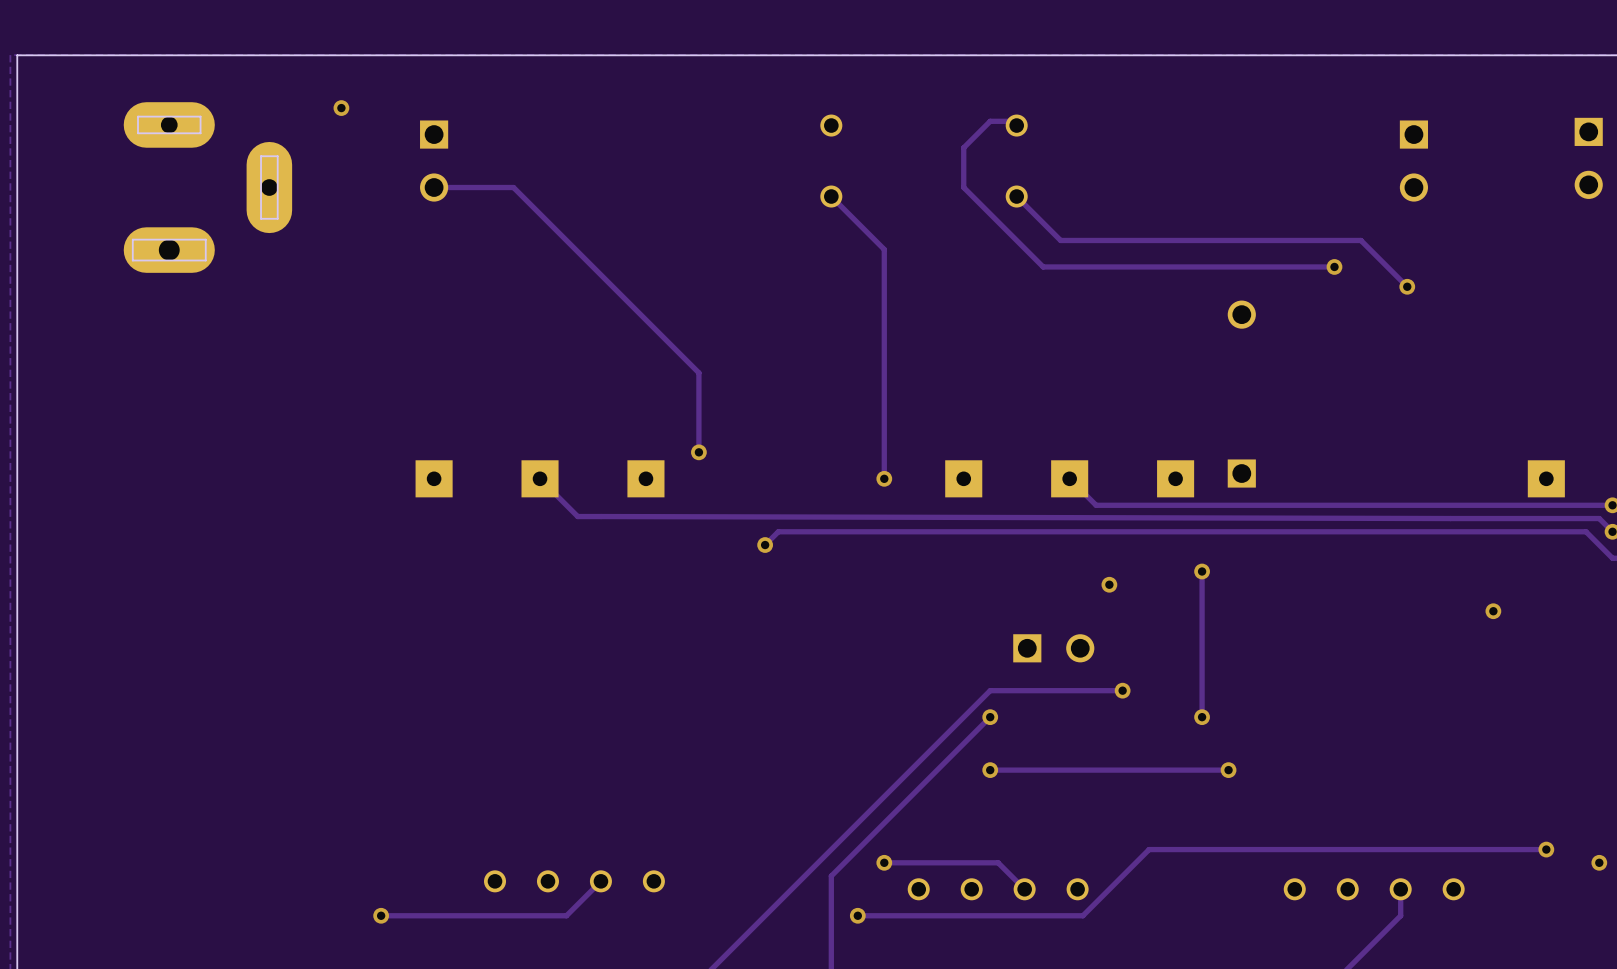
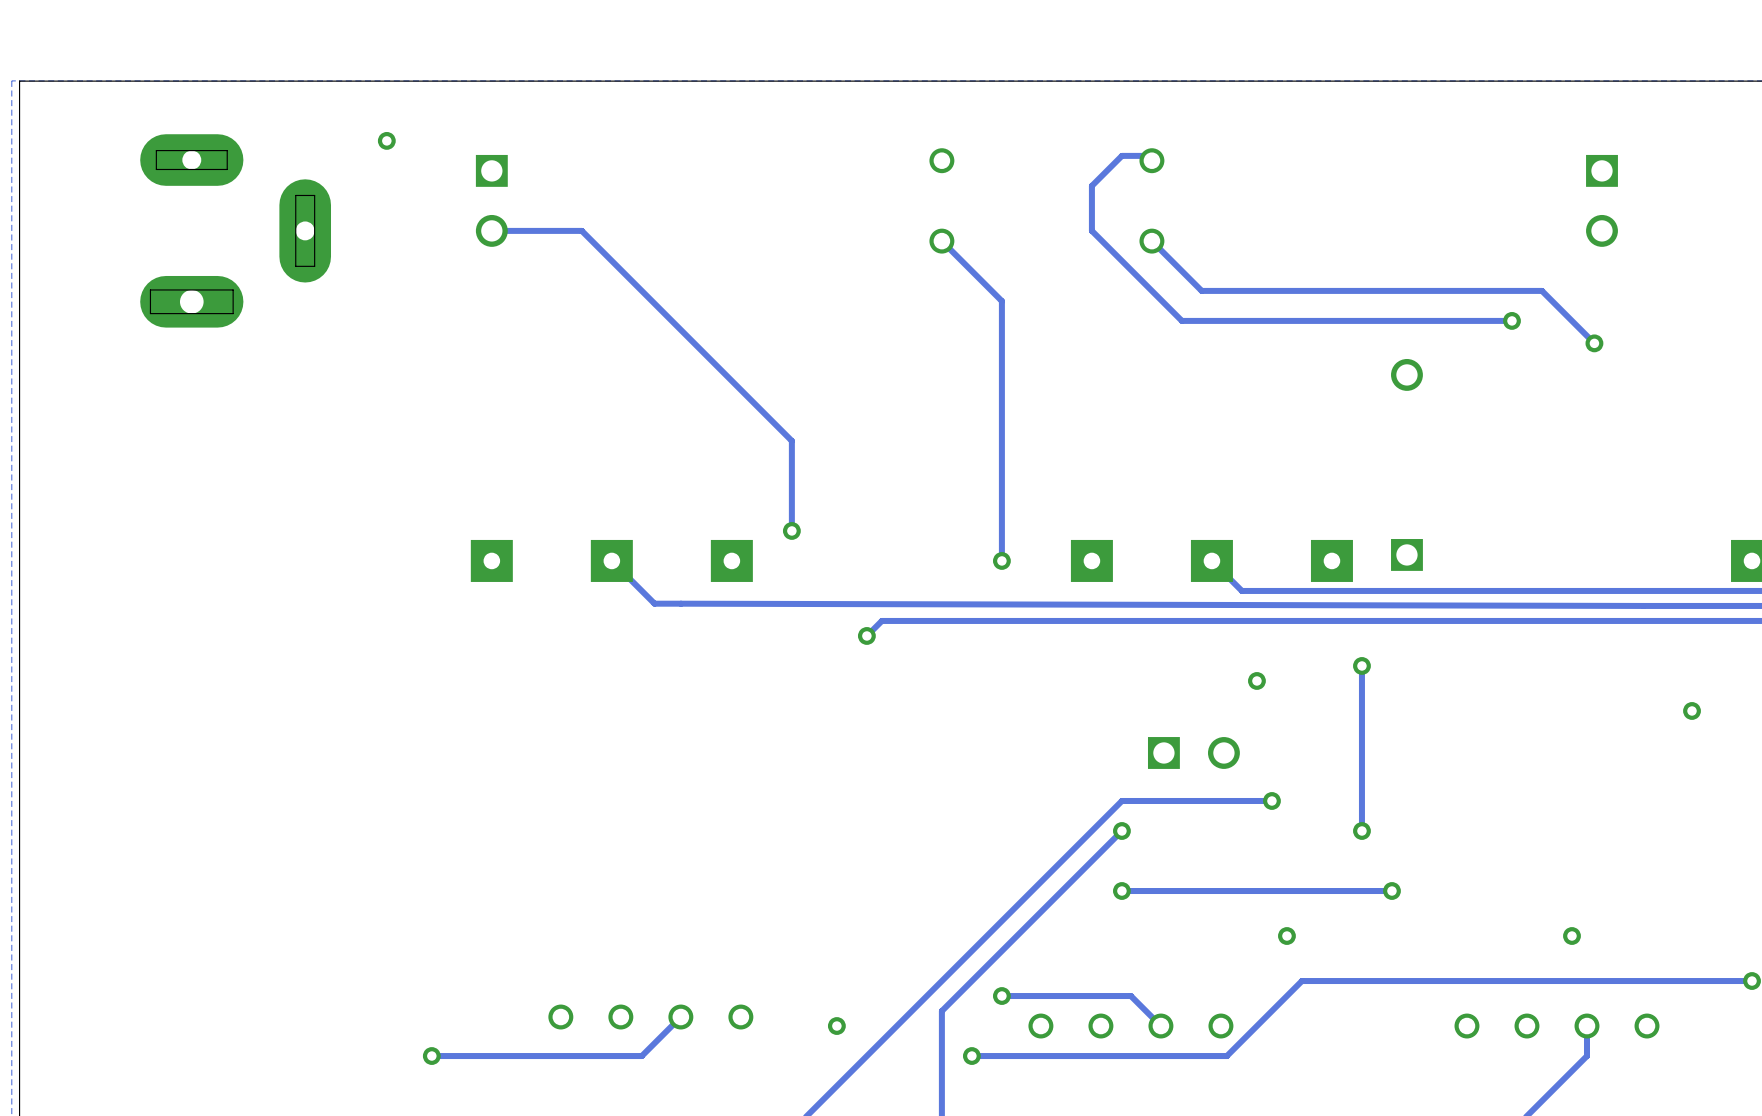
via: none -> (1286, 936)
via: none -> (1571, 936)
via: none -> (836, 1026)

